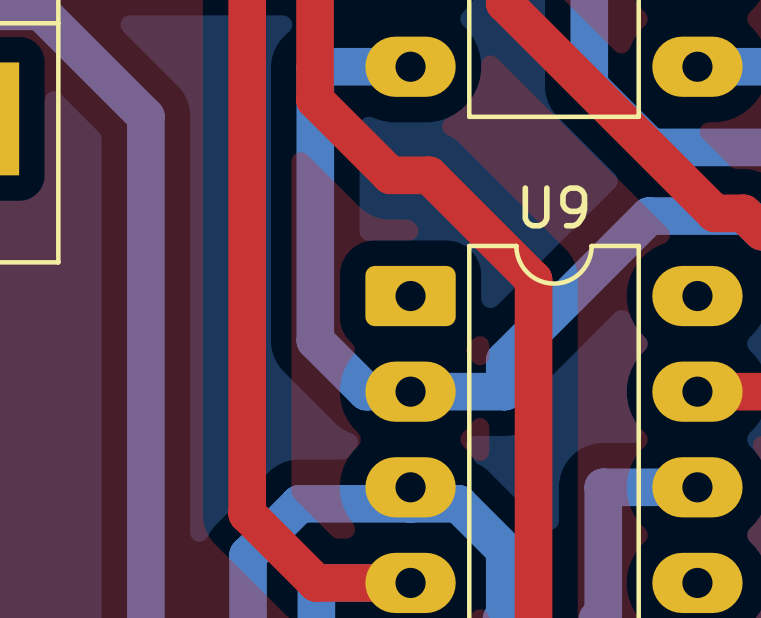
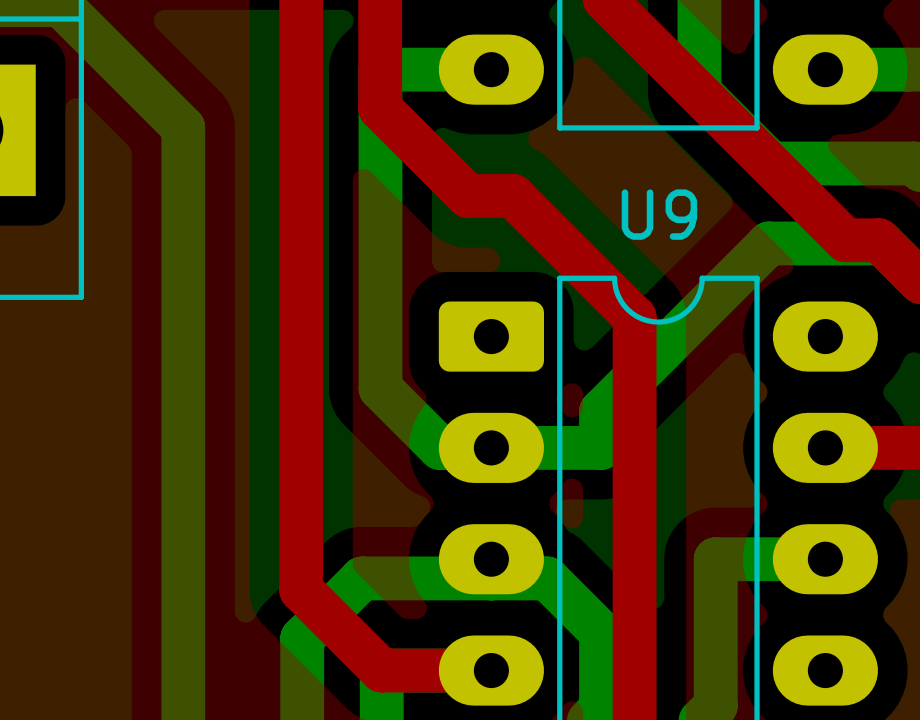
text: none -> U9 (659, 214)
U9 name: U9 (554, 206) -> none

